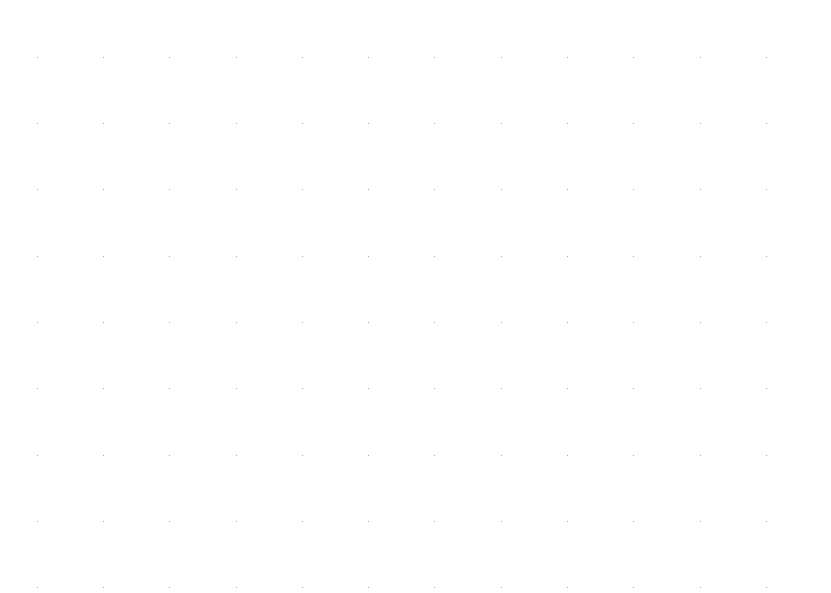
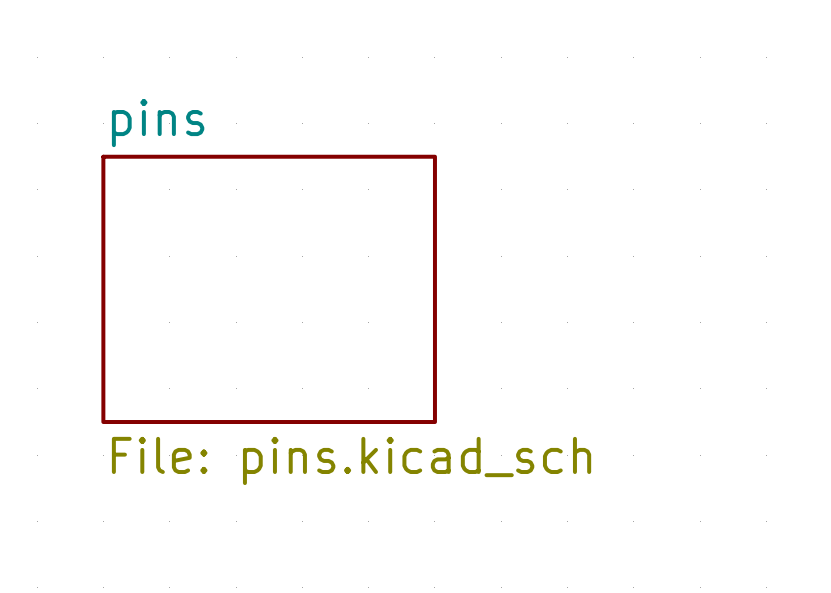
sheet pins: none -> File: pins.kicad_sch (269, 289)

